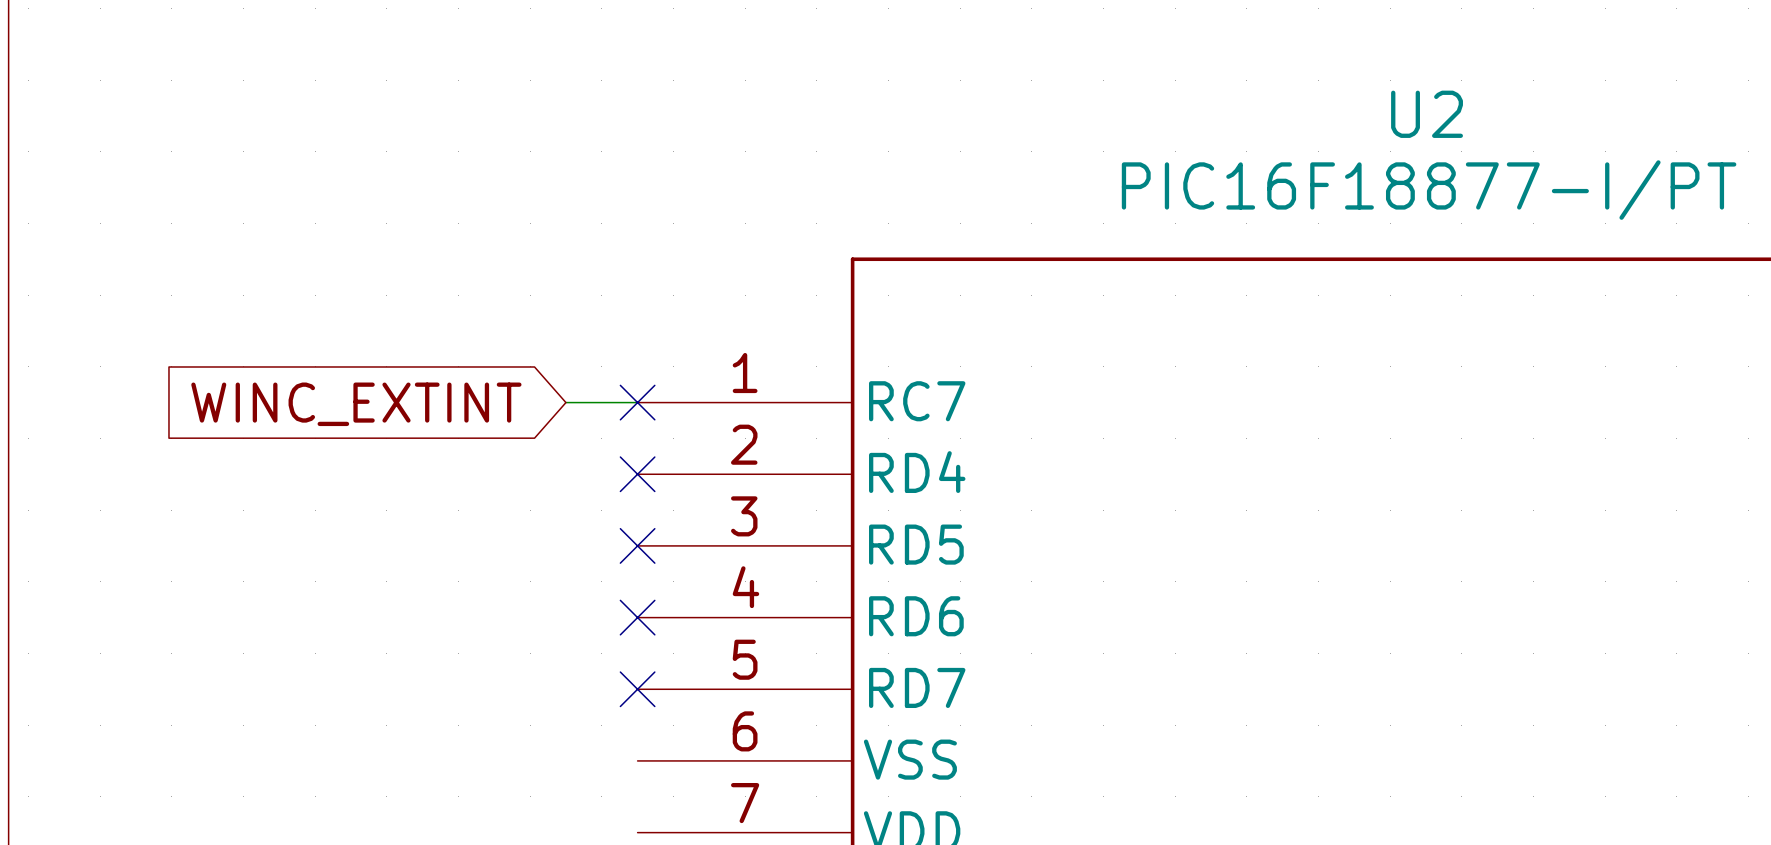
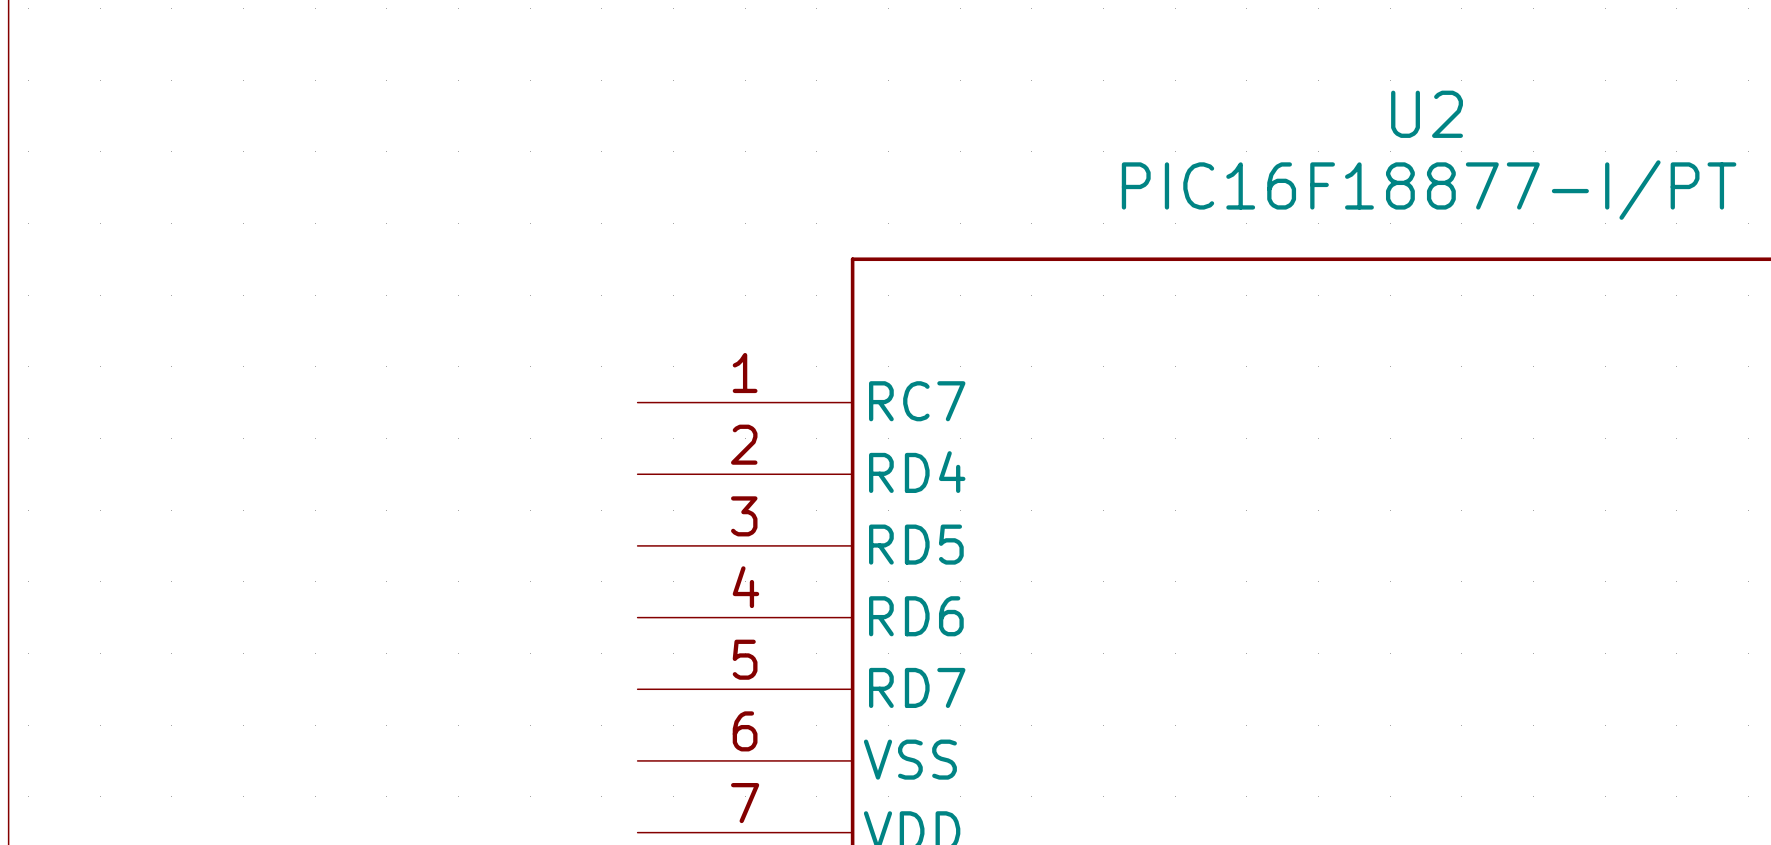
wire: (565, 402) (637, 402) -> none
no-connect mark: (637, 402) -> none
global label: WINC_EXTINT (356, 404) -> none
no-connect mark: (637, 474) -> none
no-connect mark: (637, 545) -> none
no-connect mark: (637, 617) -> none
no-connect mark: (637, 689) -> none

